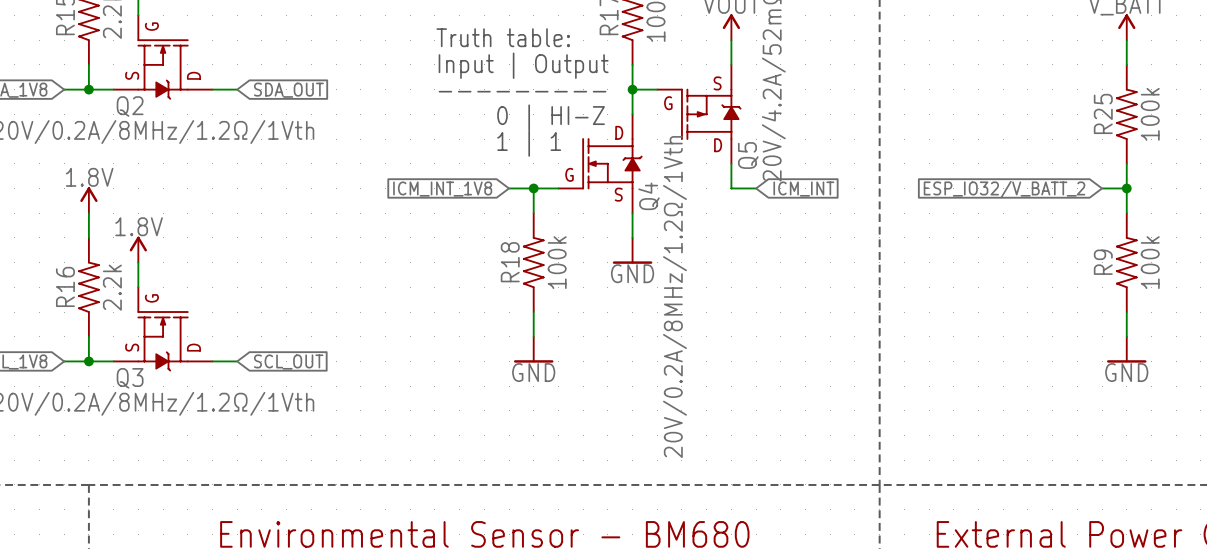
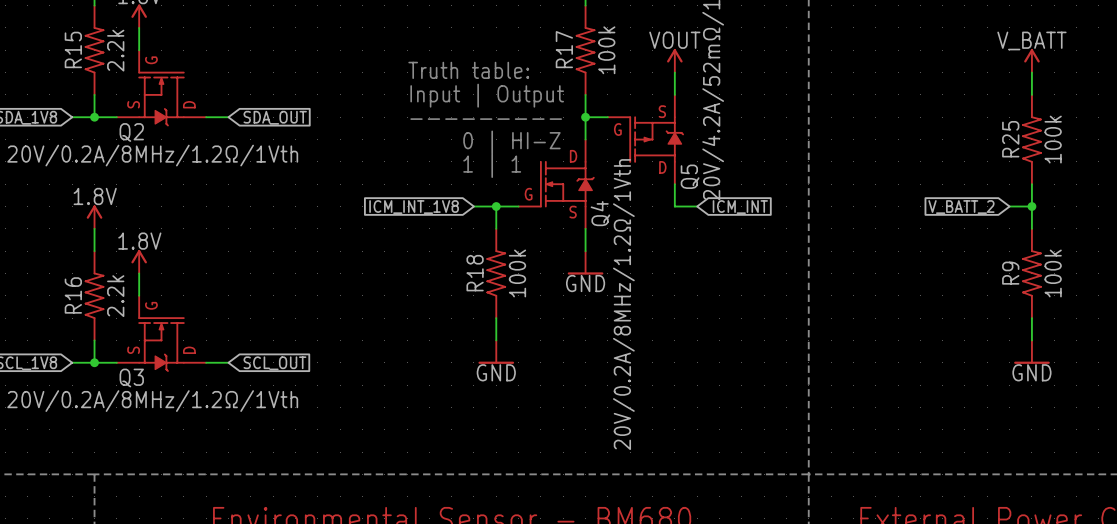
global label: ESP_IO32/V_BATT_2 (1004, 189) -> V_BATT_2 (961, 207)

